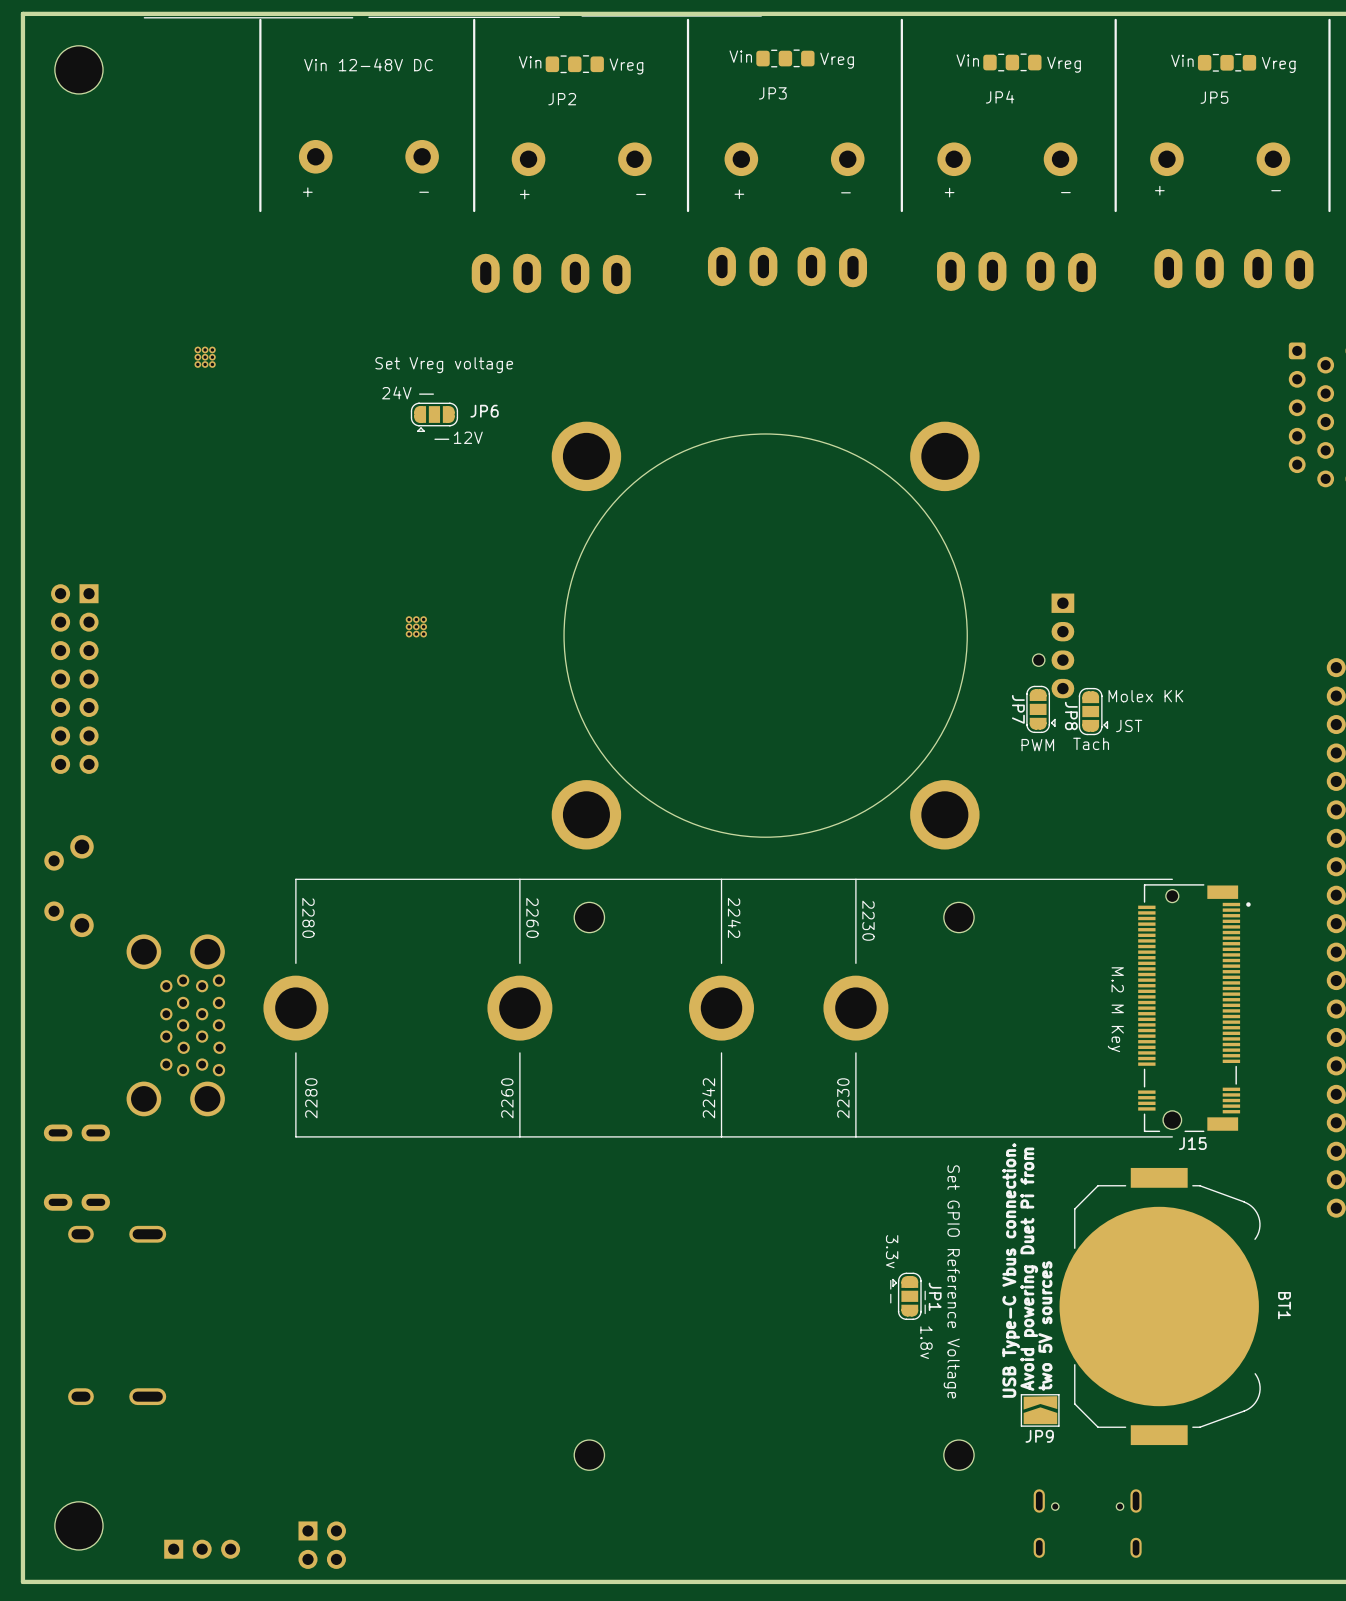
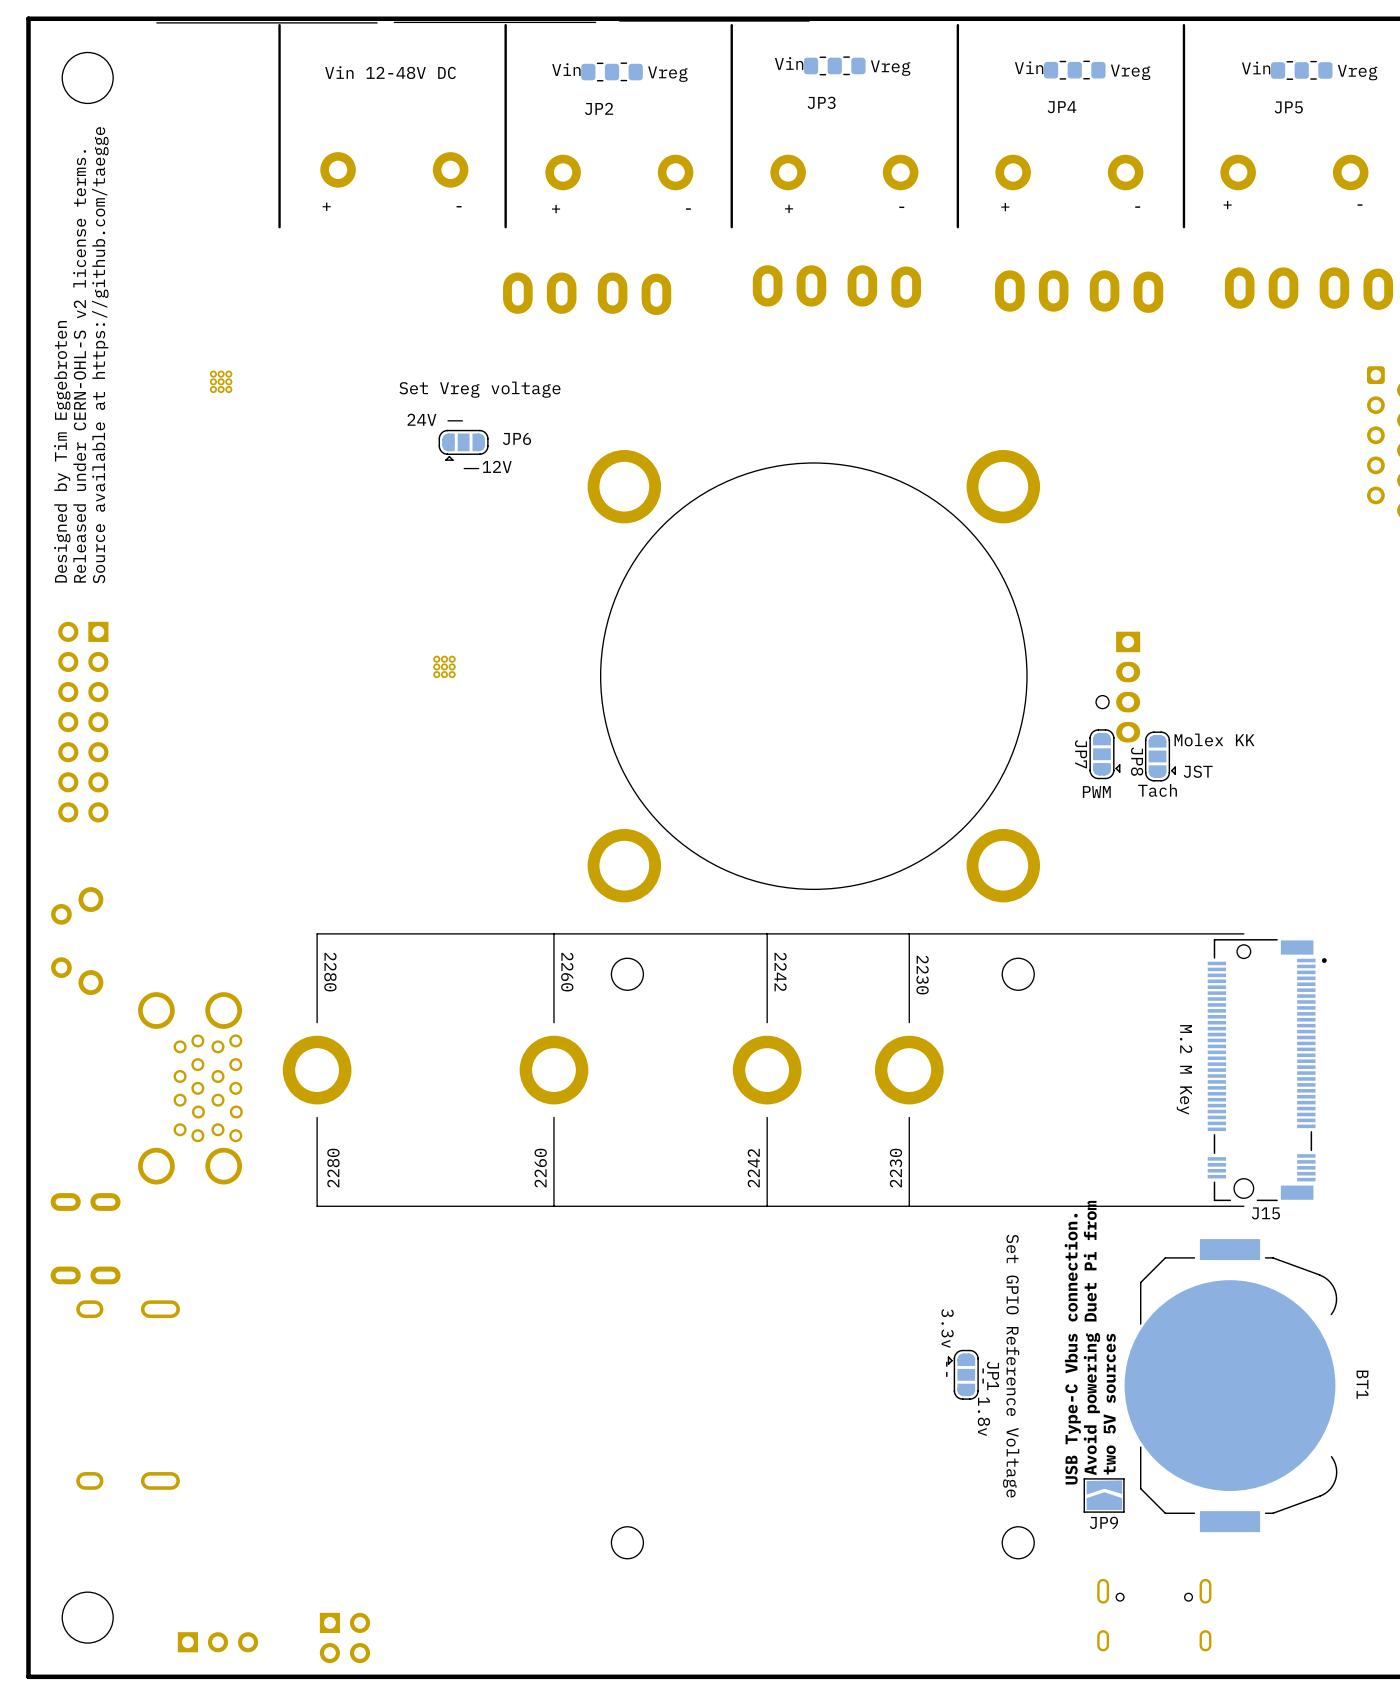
text: none -> Released under CERN-OHL-S v2 license terms. (79, 366)
text: none -> Source available at https://github.com/taegge (100, 355)
text: none -> Designed by Tim Eggebroten (62, 451)

